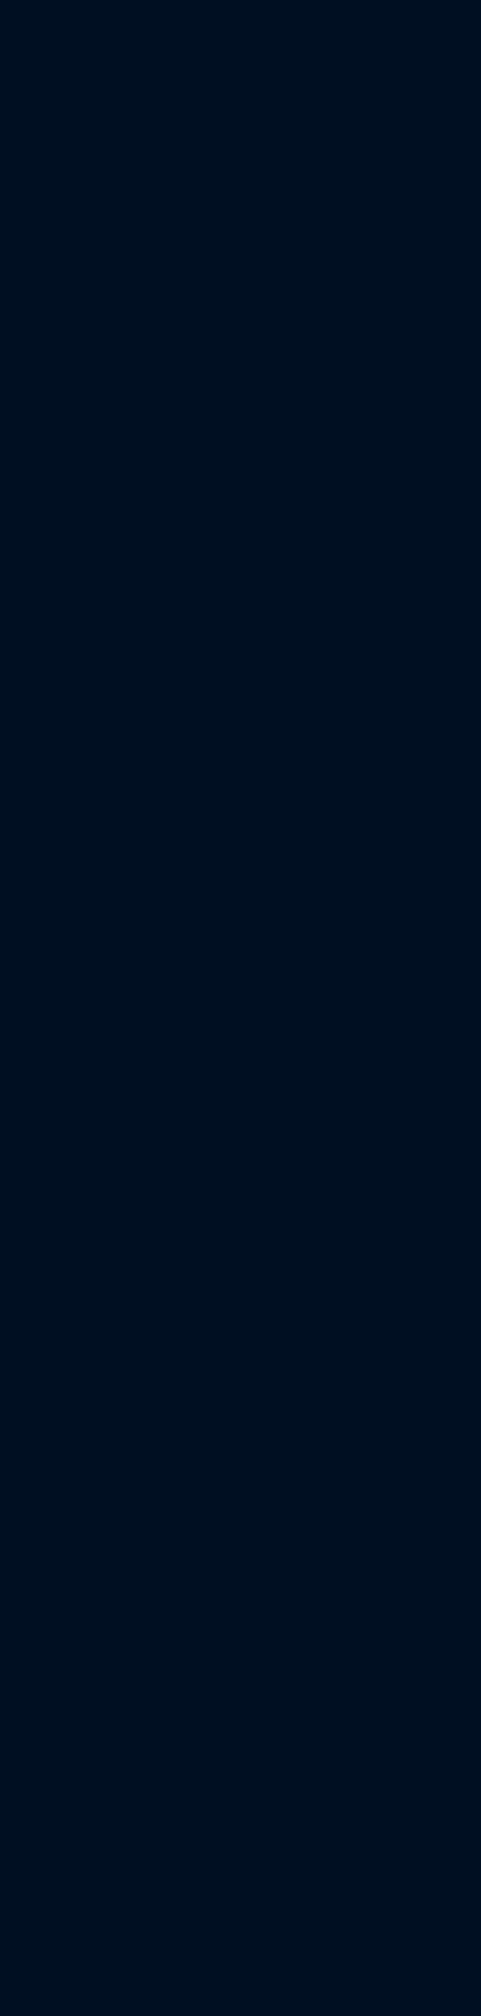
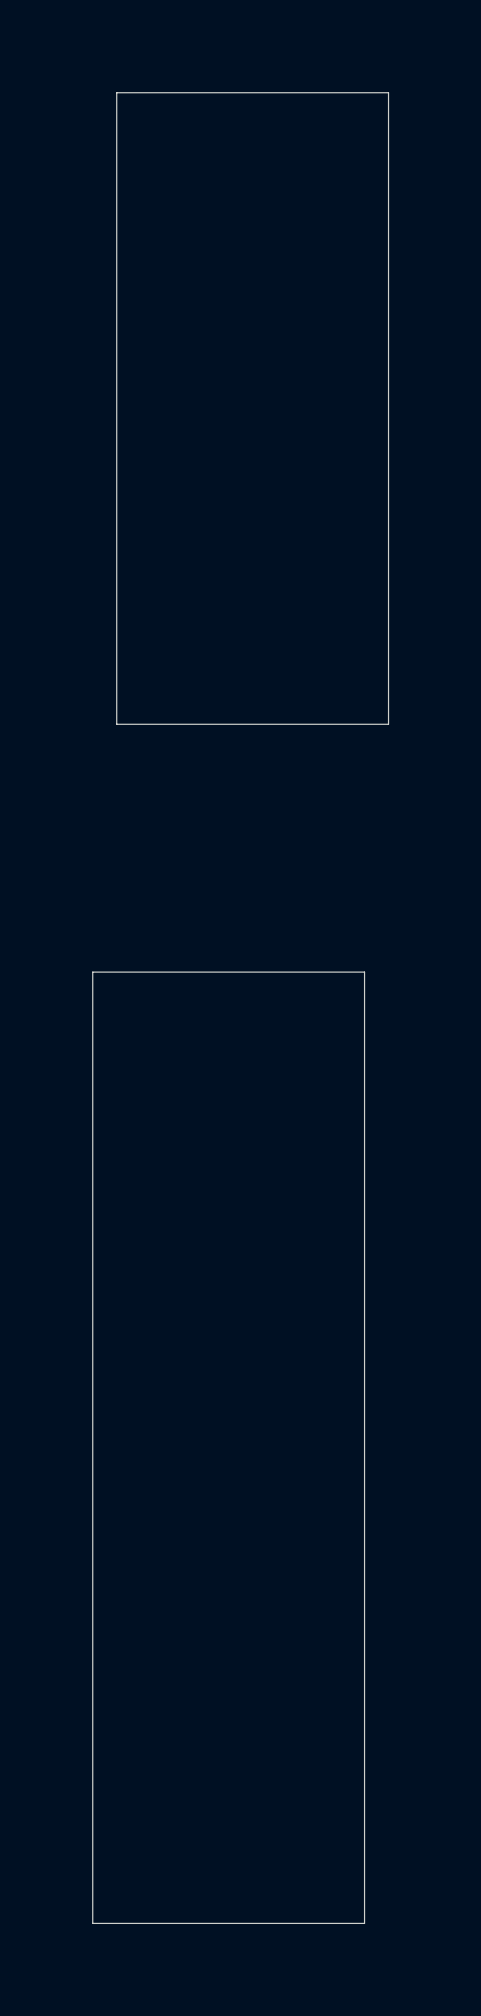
board edge: none -> (116, 92) (388, 92) (388, 724) (116, 724) (116, 92)
board edge: none -> (92, 972) (364, 972) (364, 1923) (92, 1923) (92, 972)

